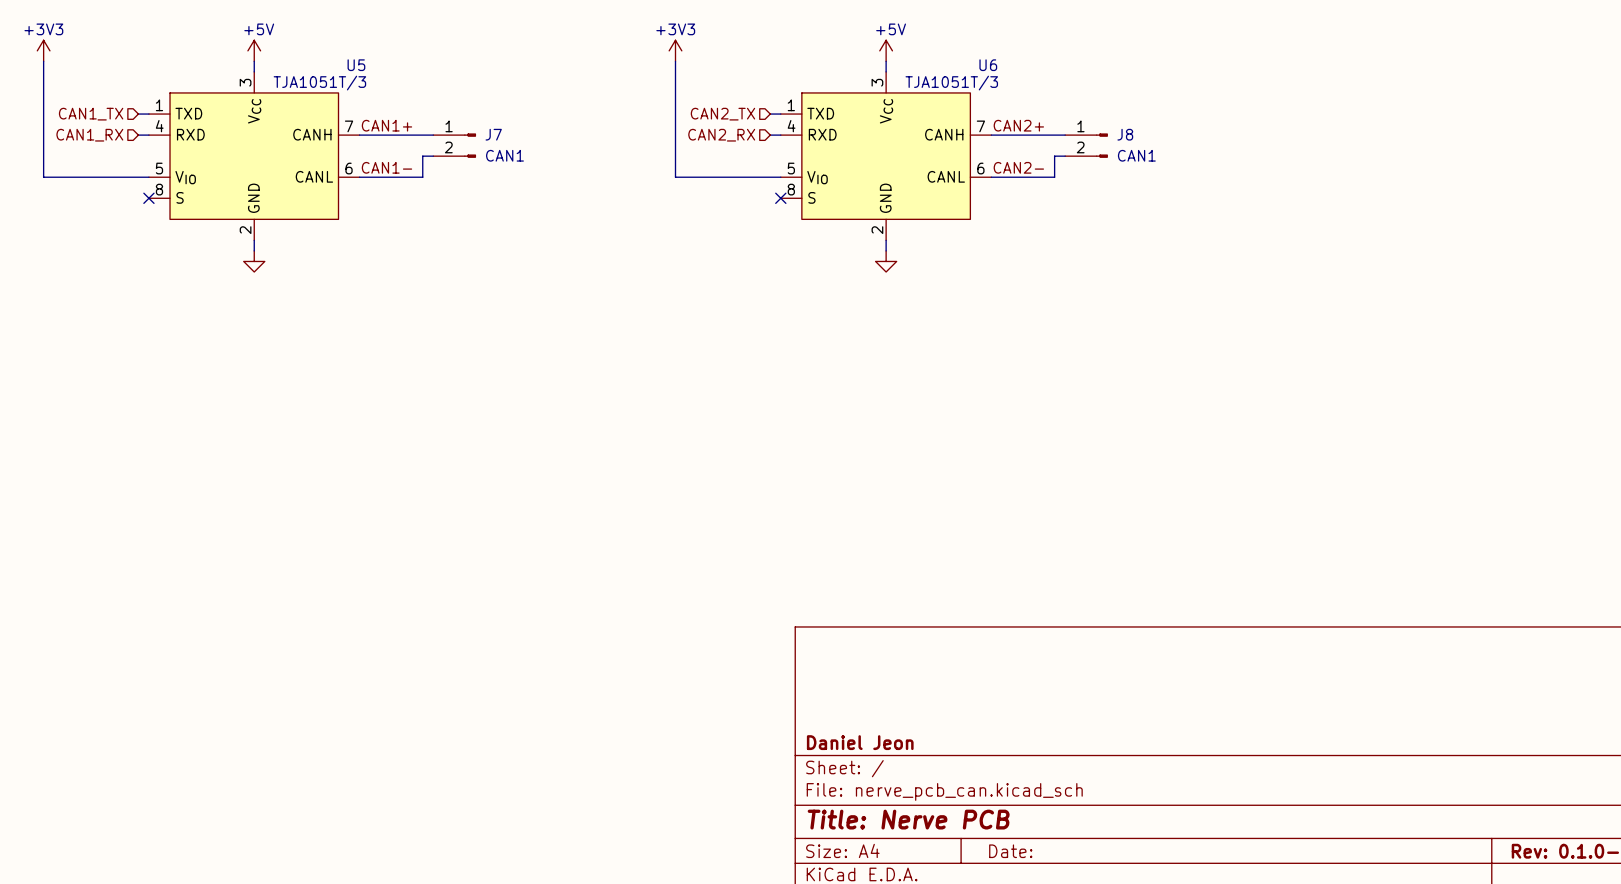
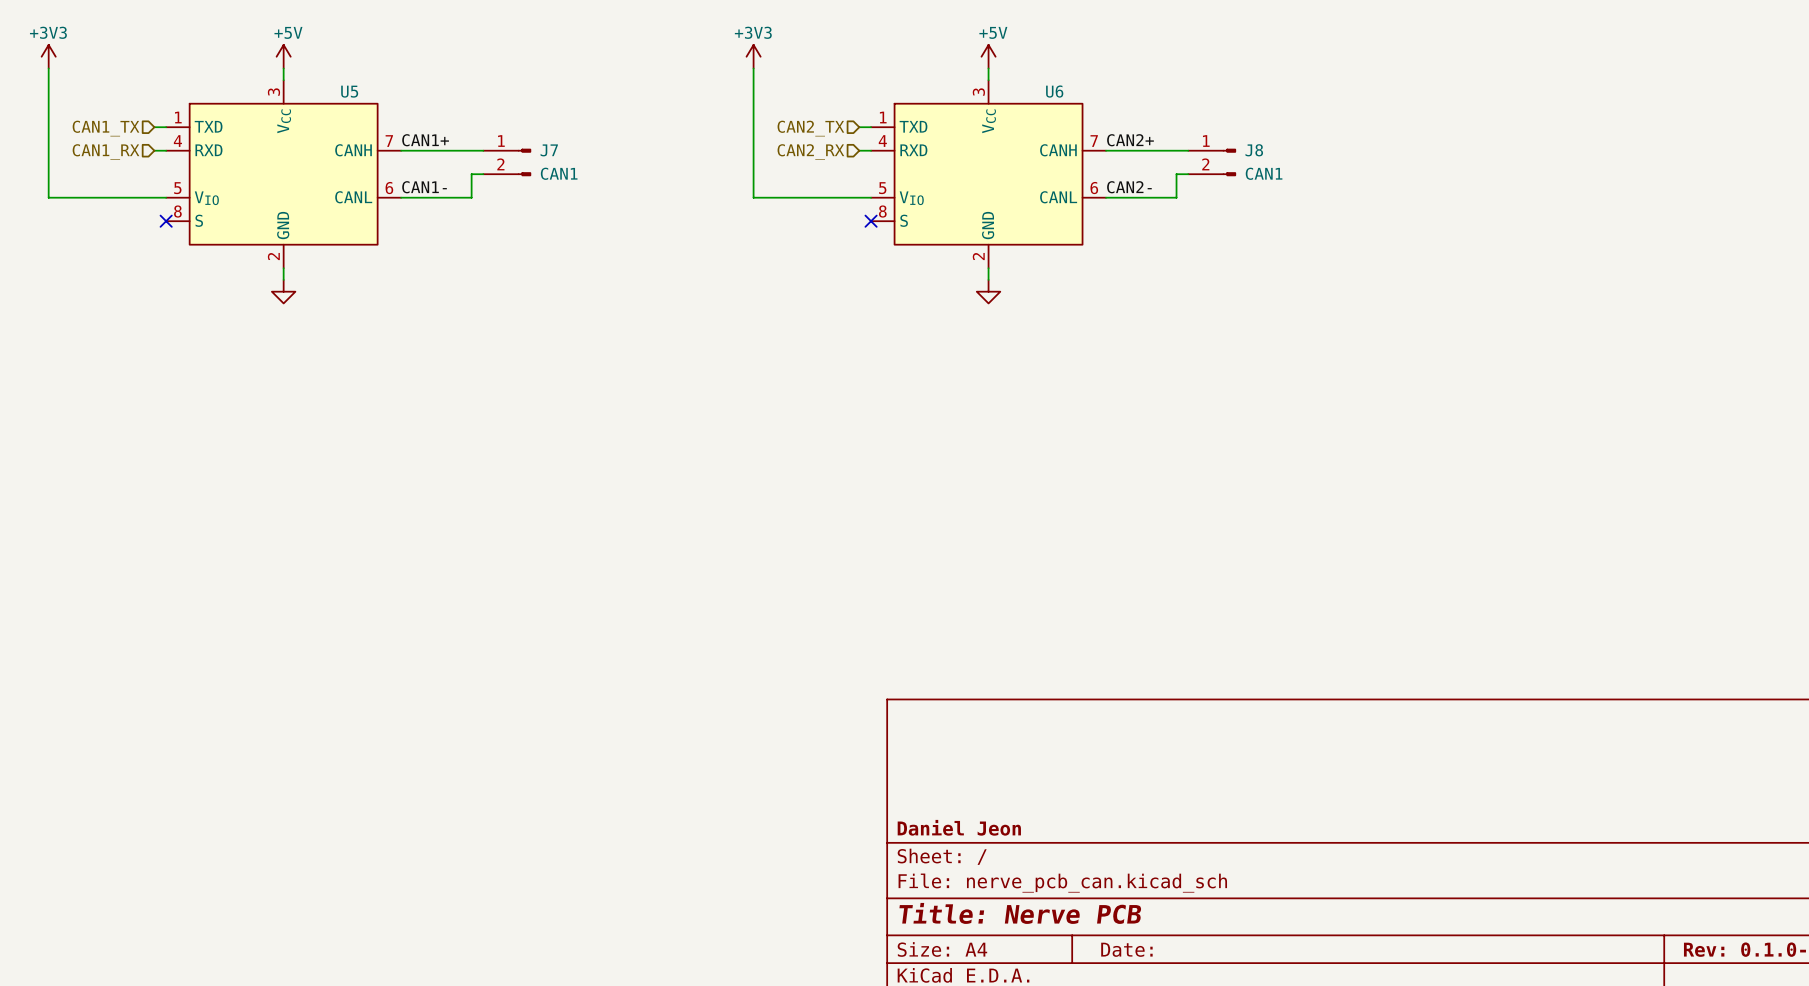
U5 name position: U5 (356, 65) -> U5 (349, 91)
U6 name position: U6 (988, 65) -> U6 (1054, 91)
U5 value: TJA1051T/3 (319, 83) -> none
U6 value: TJA1051T/3 (951, 83) -> none

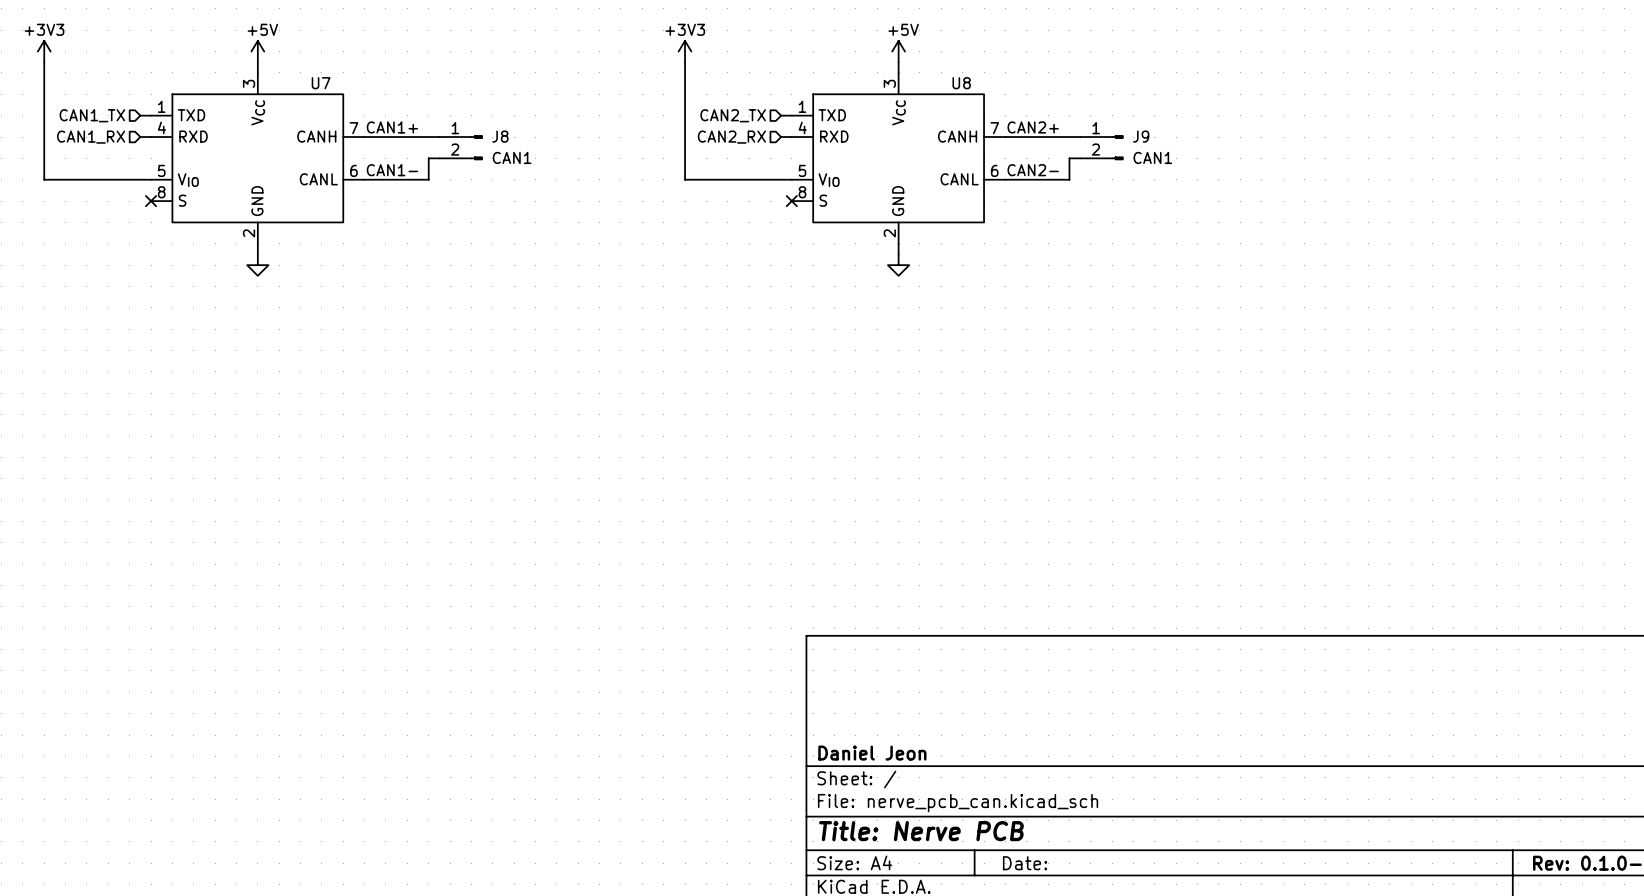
U5 name: U5 (349, 91) -> U7 (321, 83)
U6 name: U6 (1054, 91) -> U8 (961, 83)
J7 name: J7 (549, 150) -> J8 (500, 136)
J8 name: J8 (1254, 150) -> J9 (1141, 136)

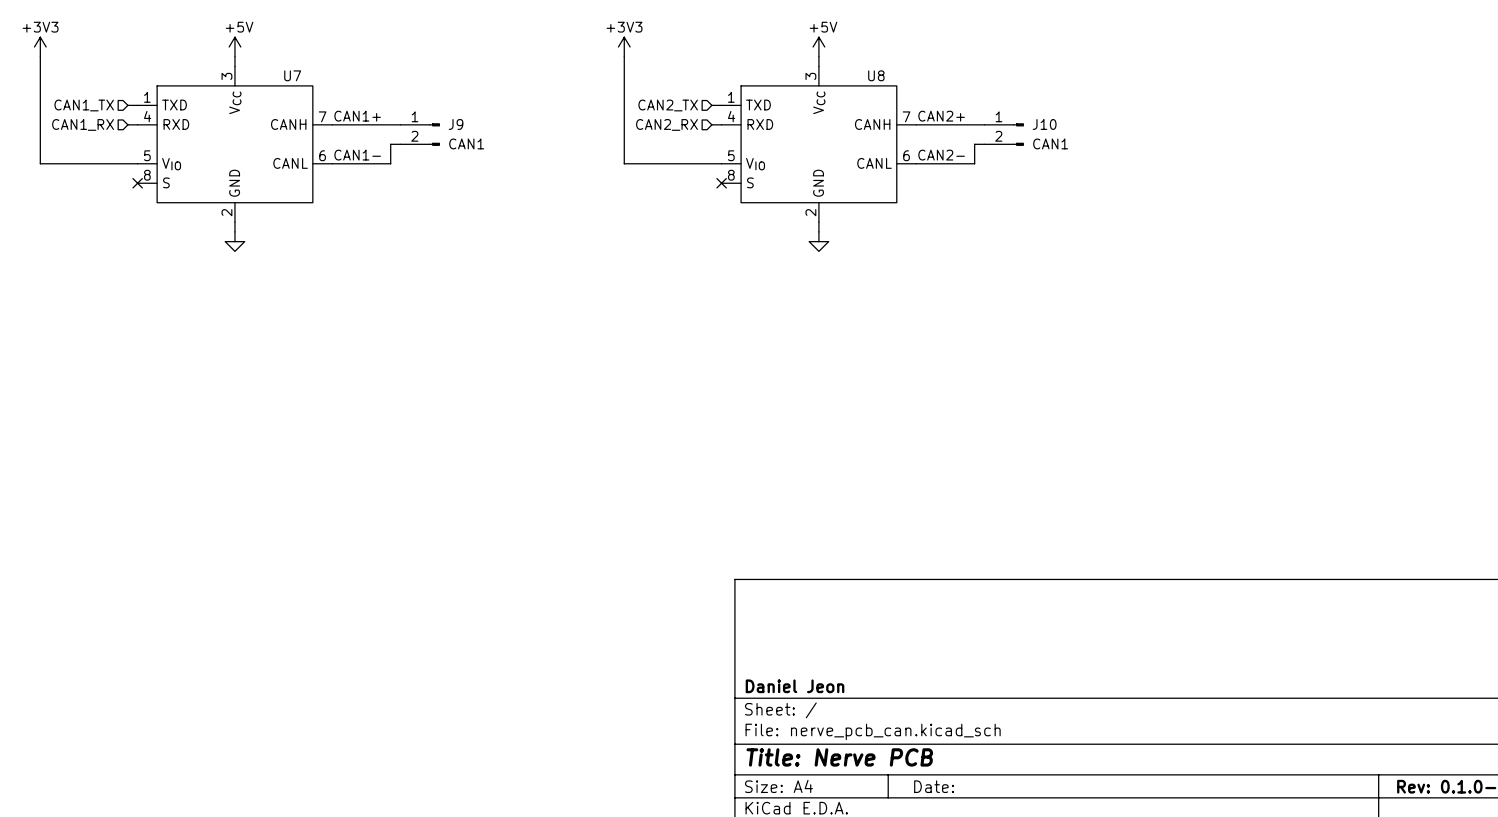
J8 name: J8 (500, 136) -> J9 (456, 124)
J9 name: J9 (1141, 136) -> J10 (1044, 124)

